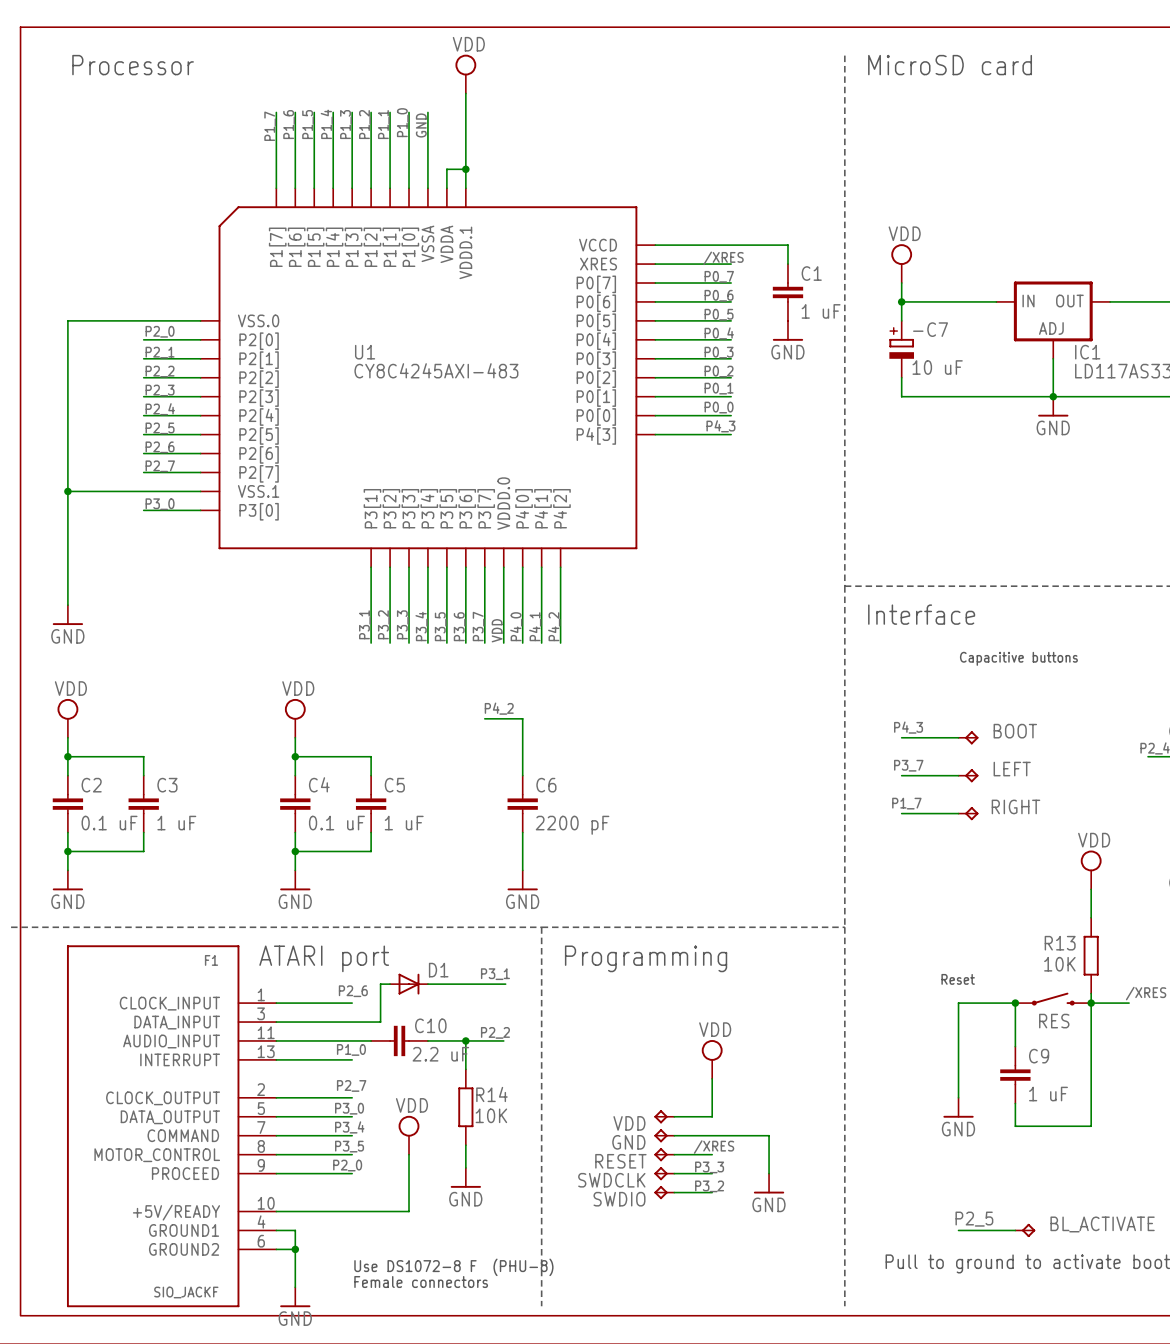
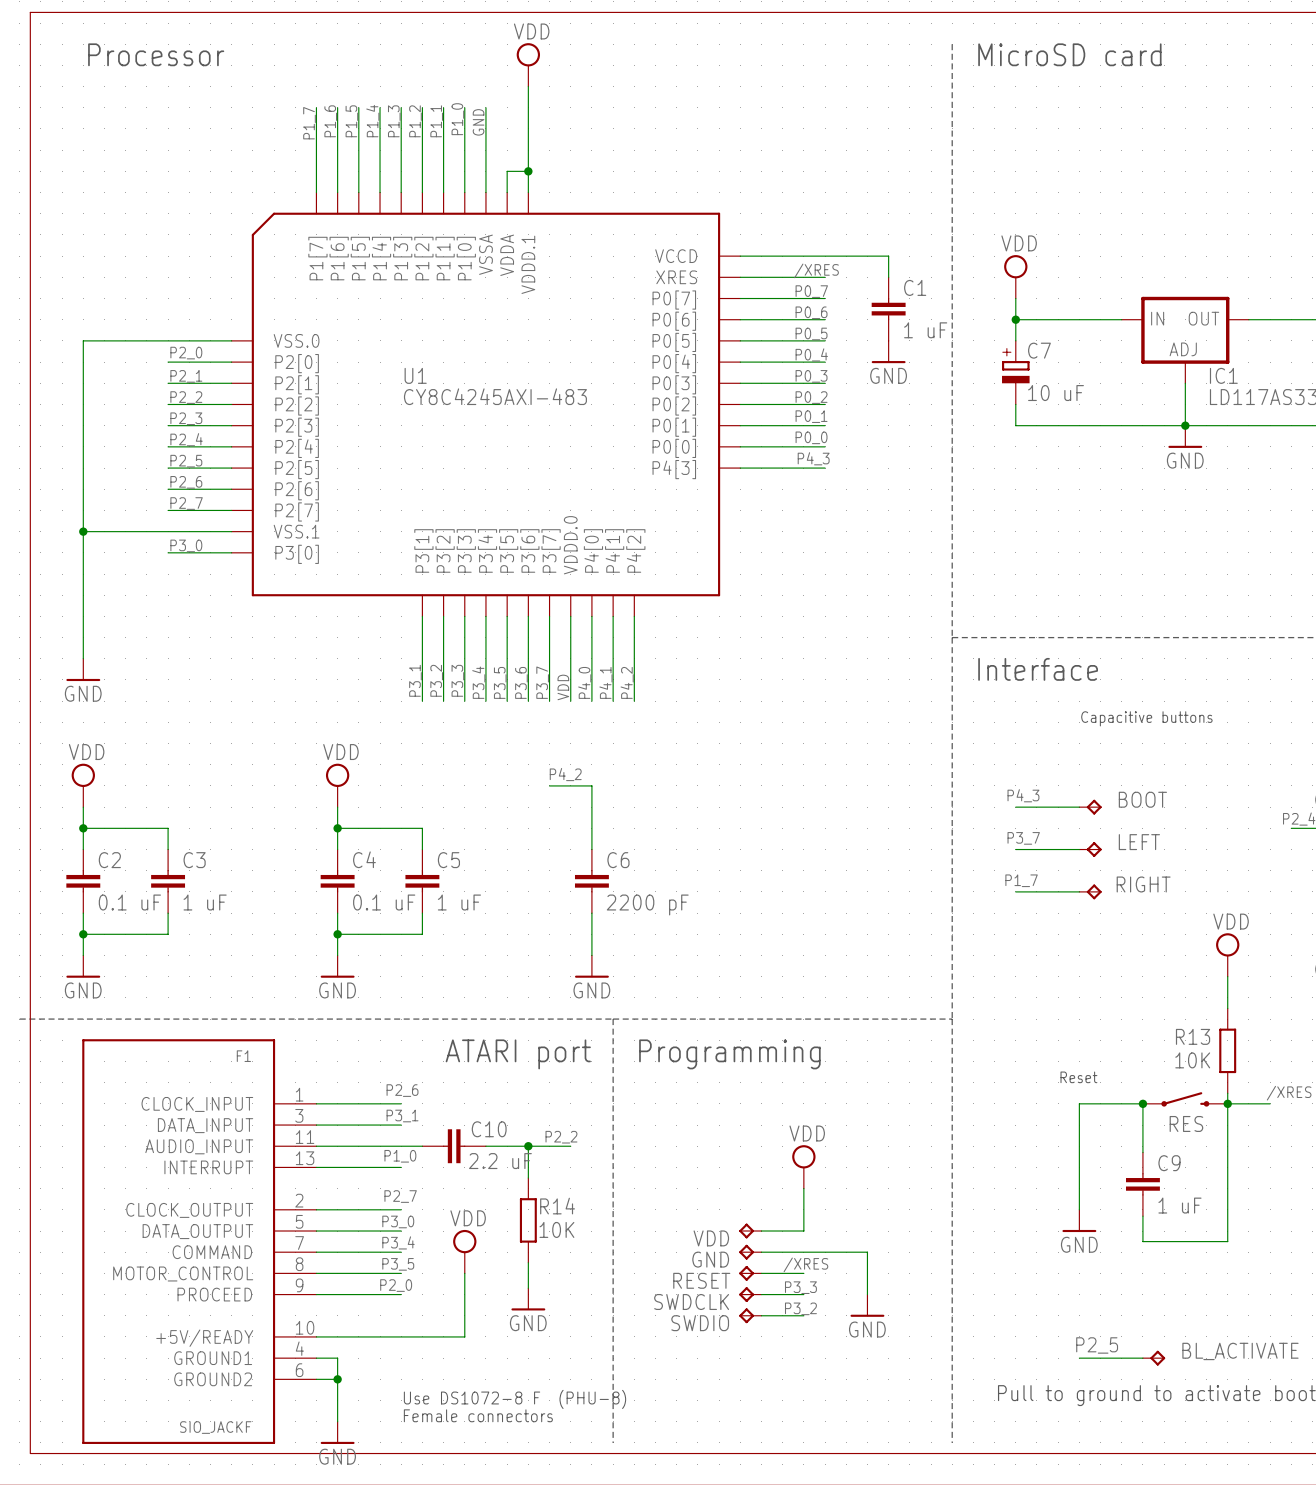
-C7 name: -C7 (930, 329) -> C7 (1039, 350)
text position: ATARI port (324, 958) -> ATARI port (518, 1054)
label position: P3_1 (495, 974) -> P3_1 (402, 1116)
wire: (390, 984) (380, 984) (380, 1022) (352, 1022) -> none
D1: (409, 984) -> none
wire: (427, 984) (505, 984) -> none

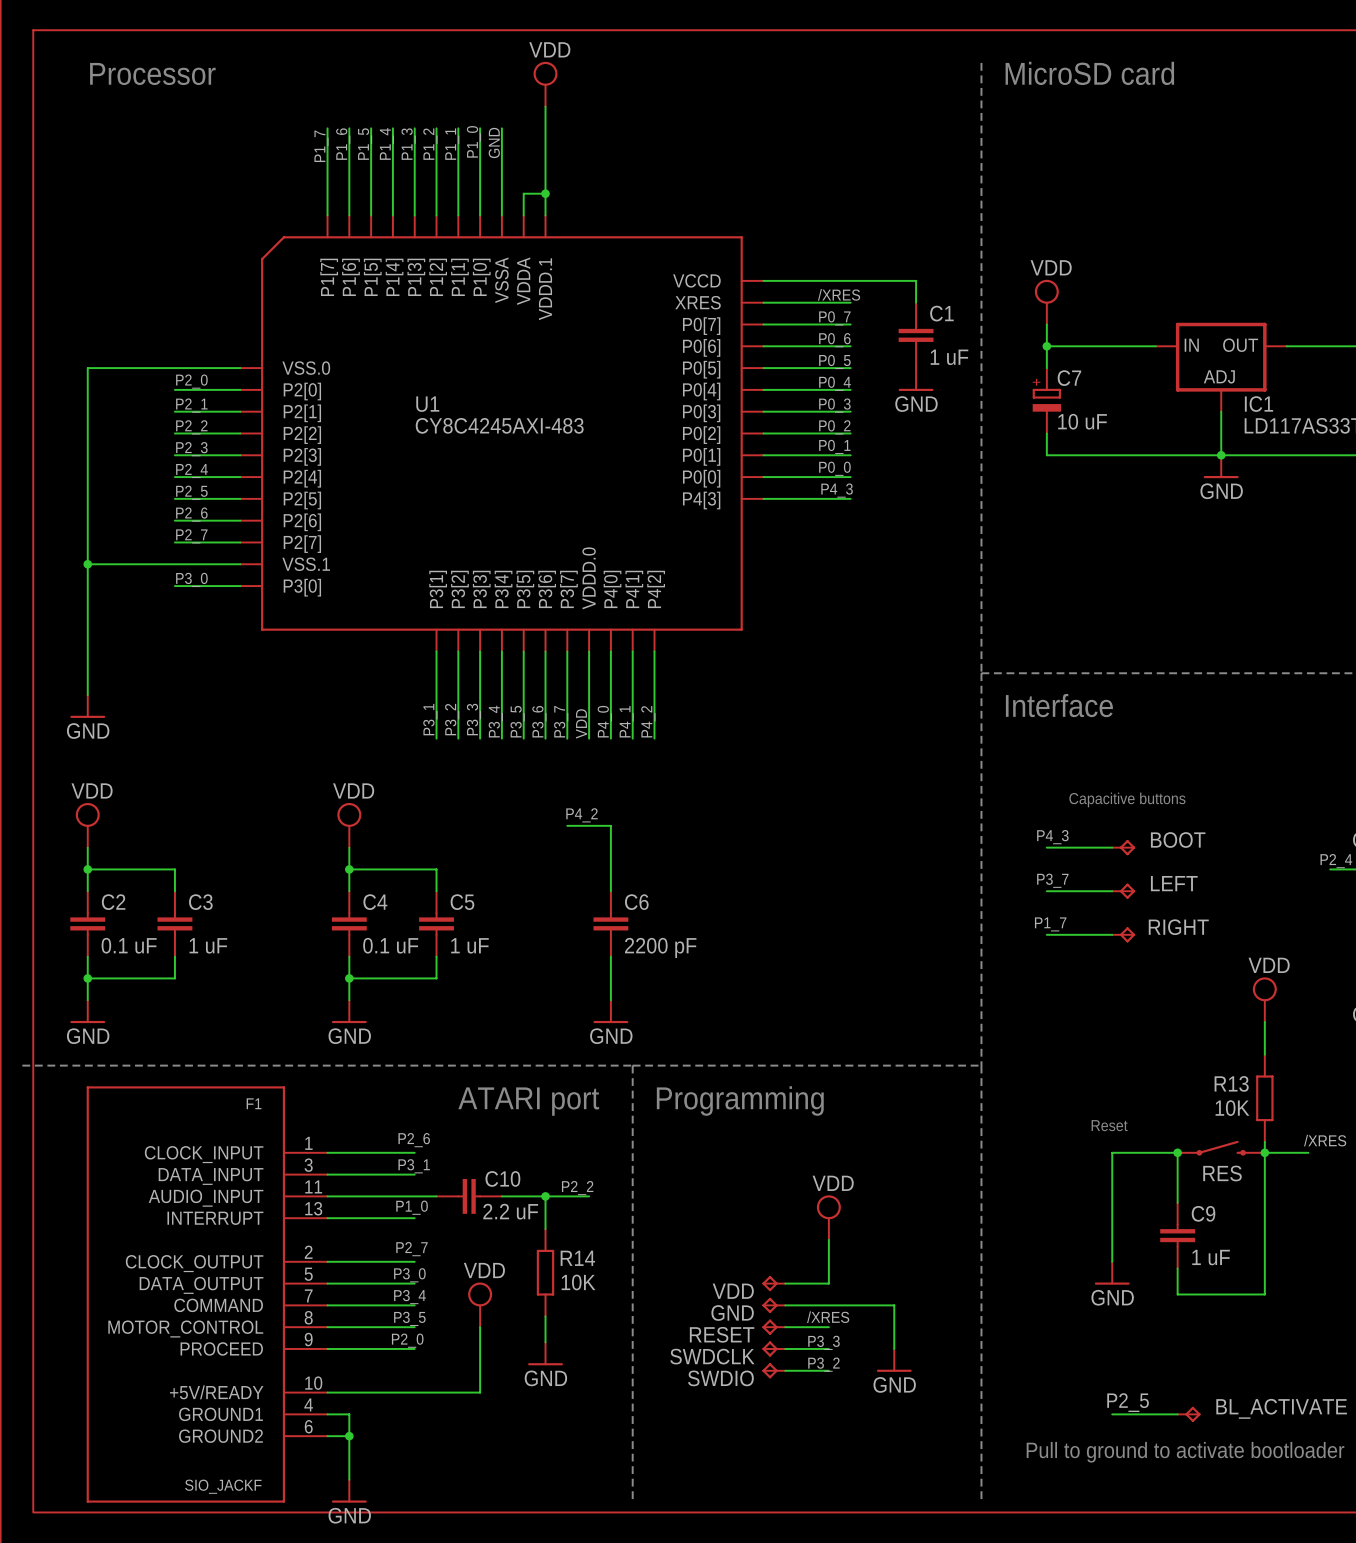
text position: Capacitive buttons (1146, 718) -> Capacitive buttons (1127, 799)
text: Use DS1072-8 F (PHU-8) (514, 1399) -> none
text: Female connectors (478, 1415) -> none

